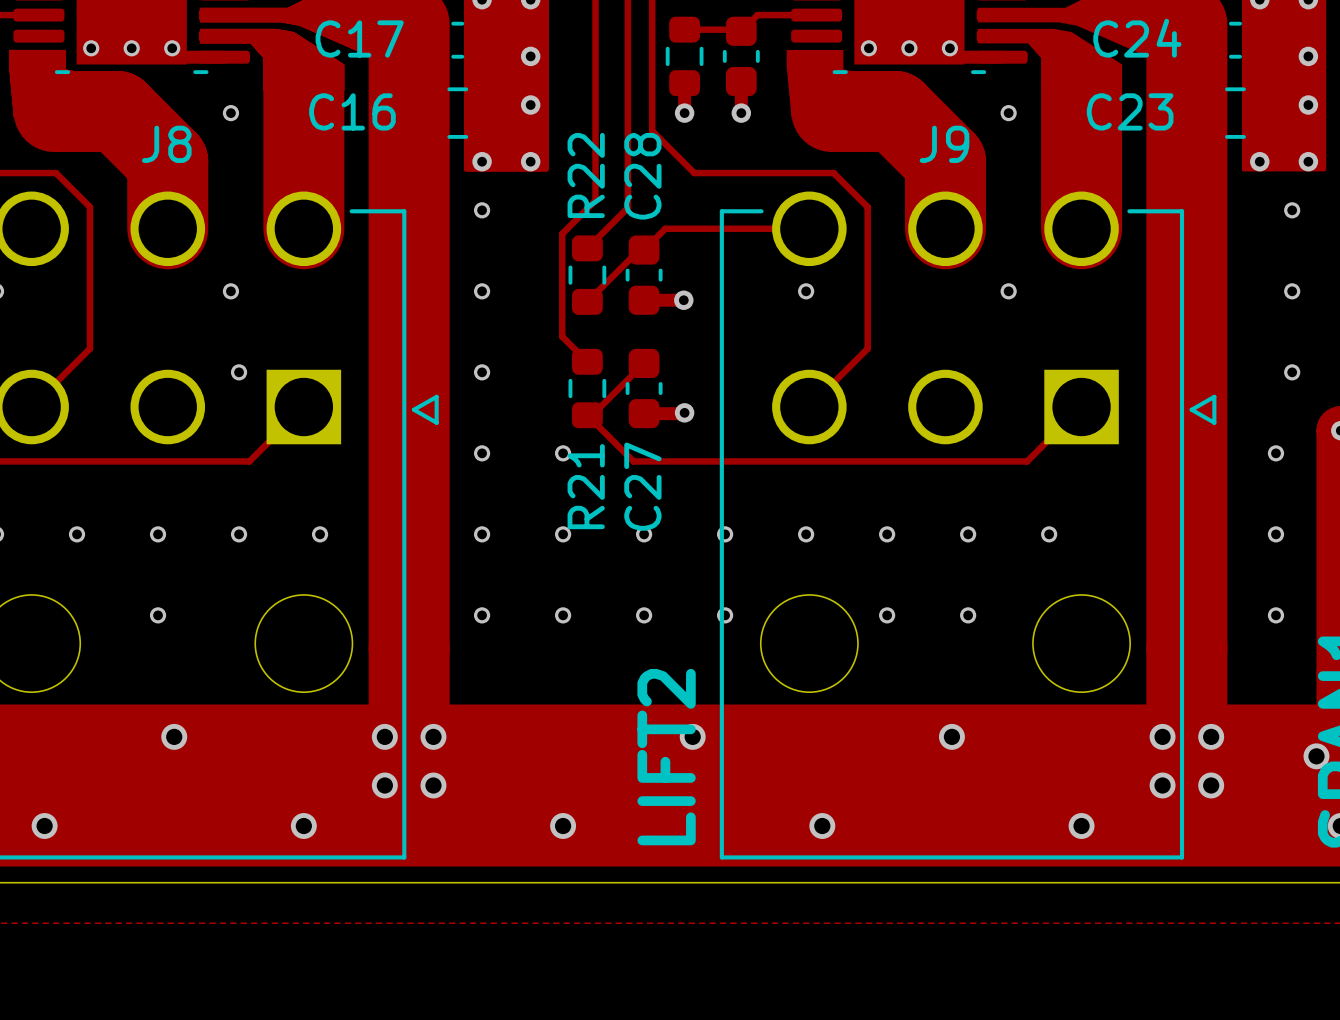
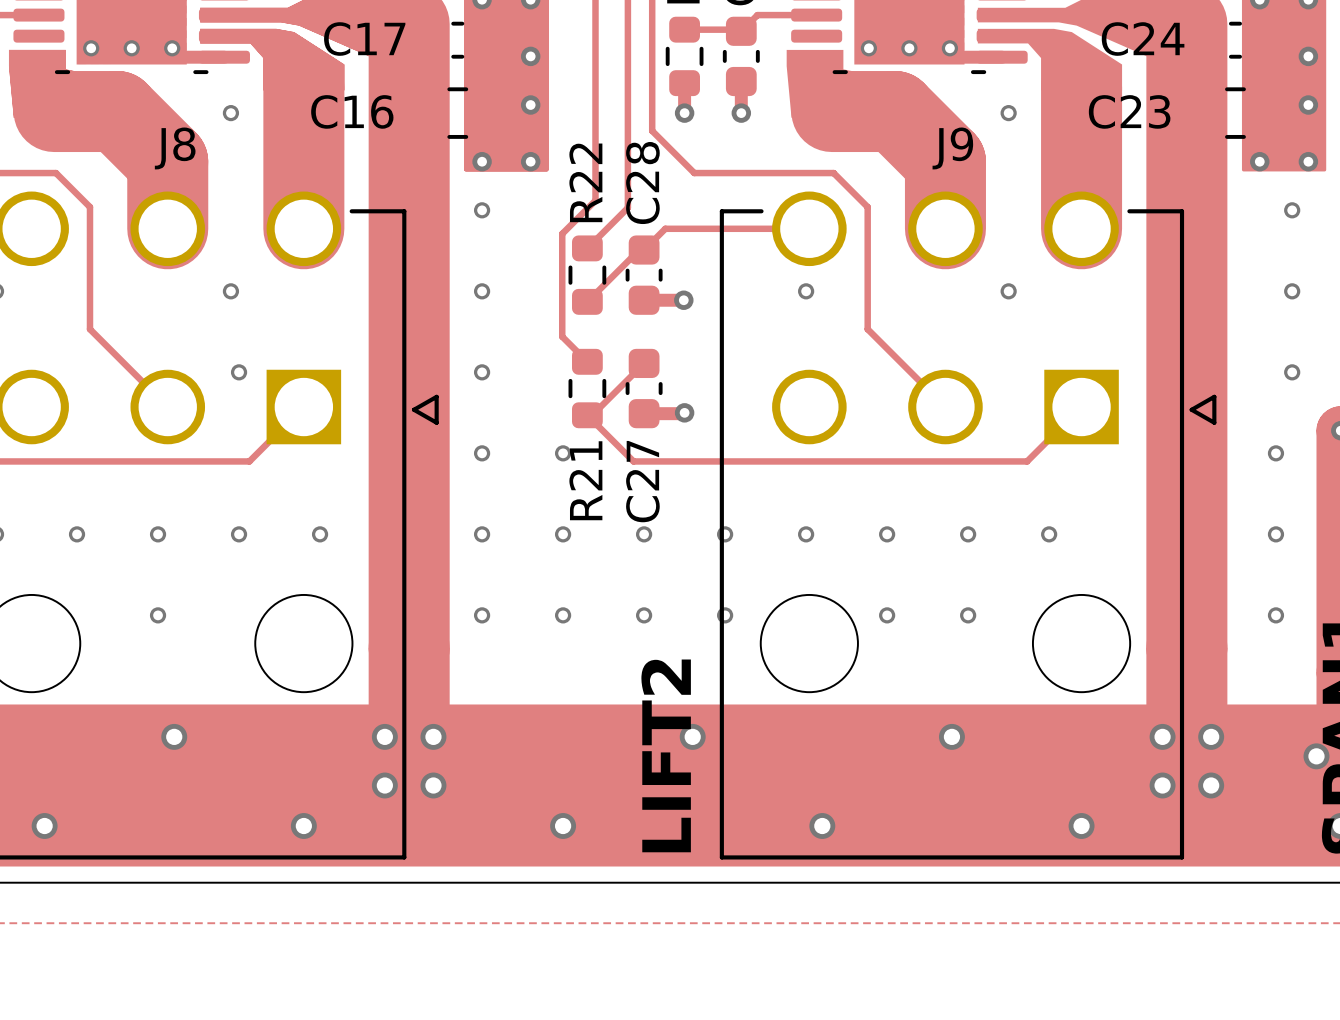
track: (89, 329) (89, 348) (31, 407) -> (89, 329) (167, 407)
track: (867, 329) (867, 348) (809, 407) -> (867, 329) (945, 407)

